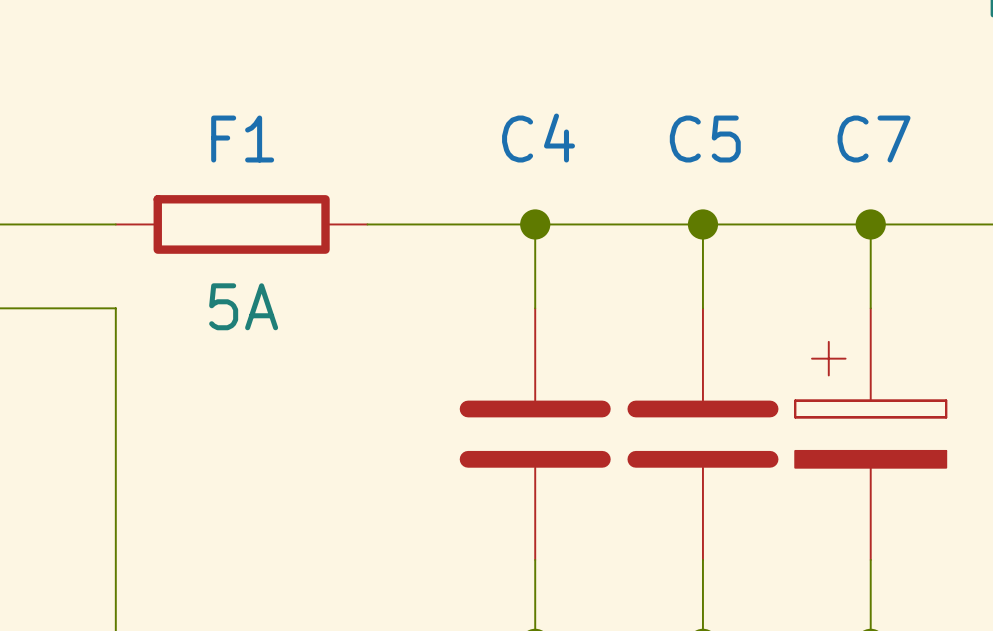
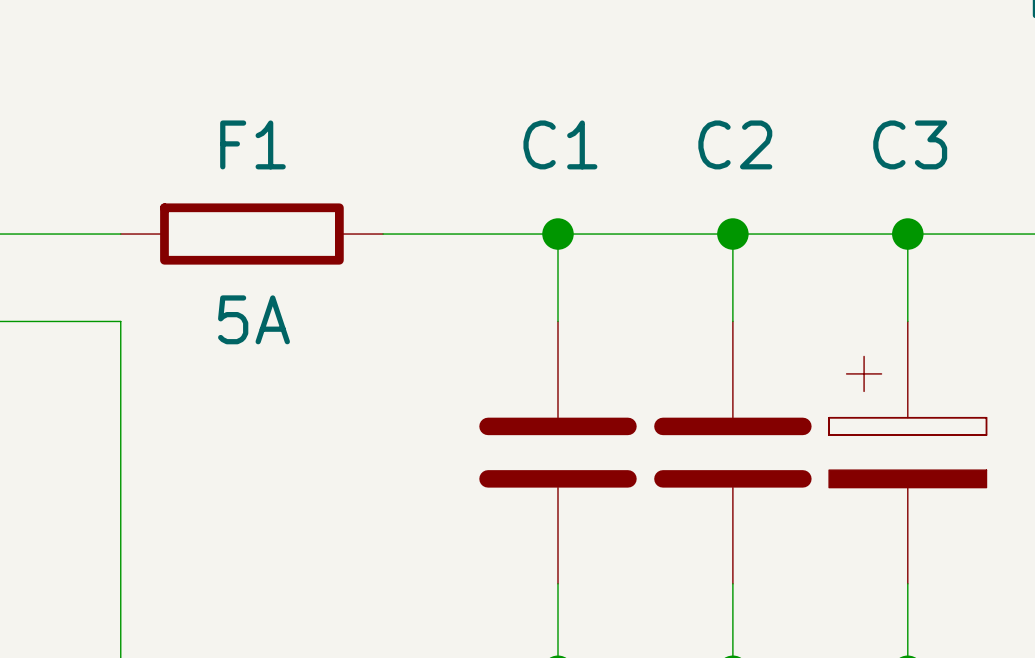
C4 name: C4 (538, 138) -> C1 (560, 144)
C5 name: C5 (705, 139) -> C2 (735, 144)
C7 name: C7 (874, 139) -> C3 (910, 144)

